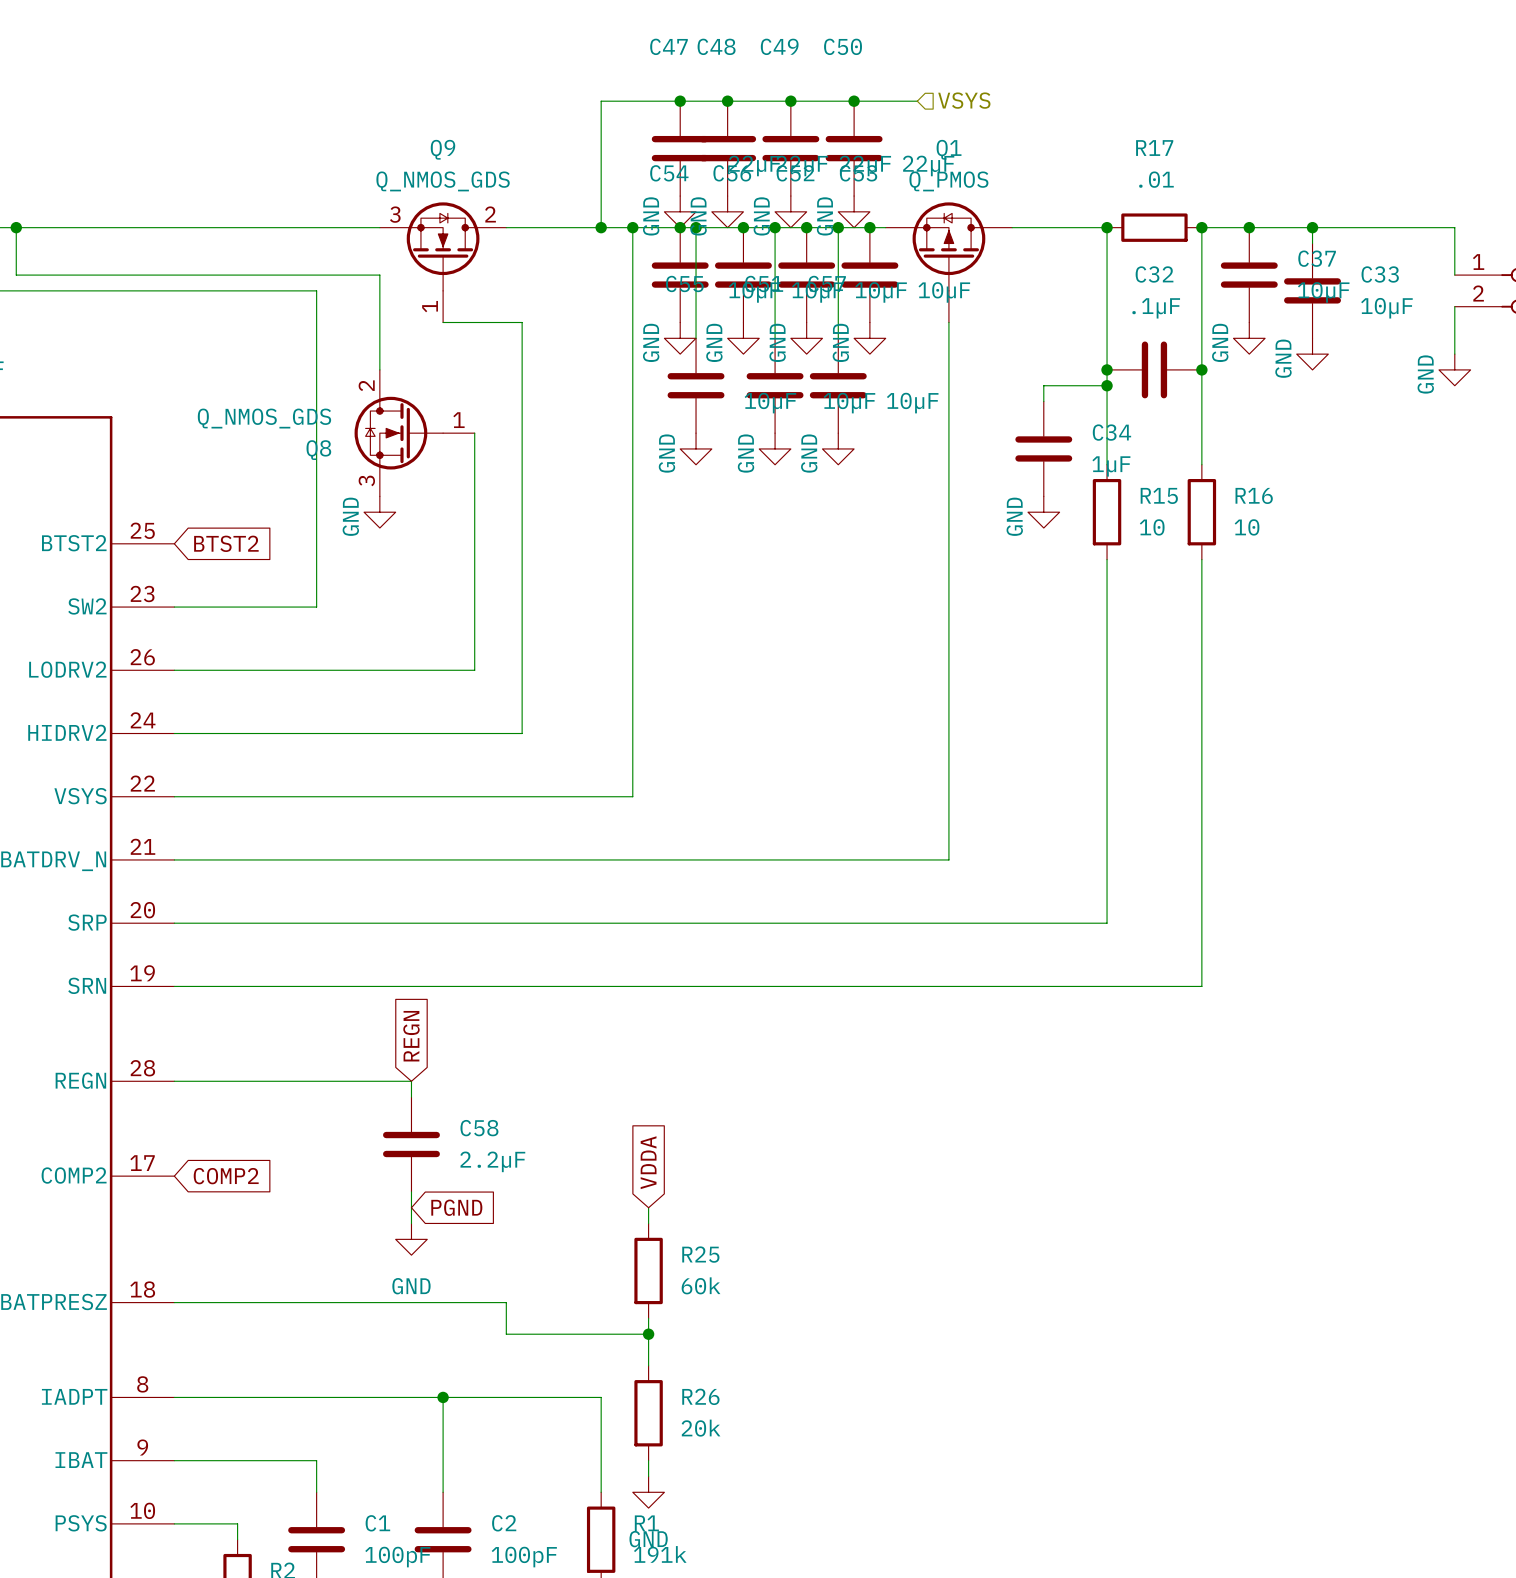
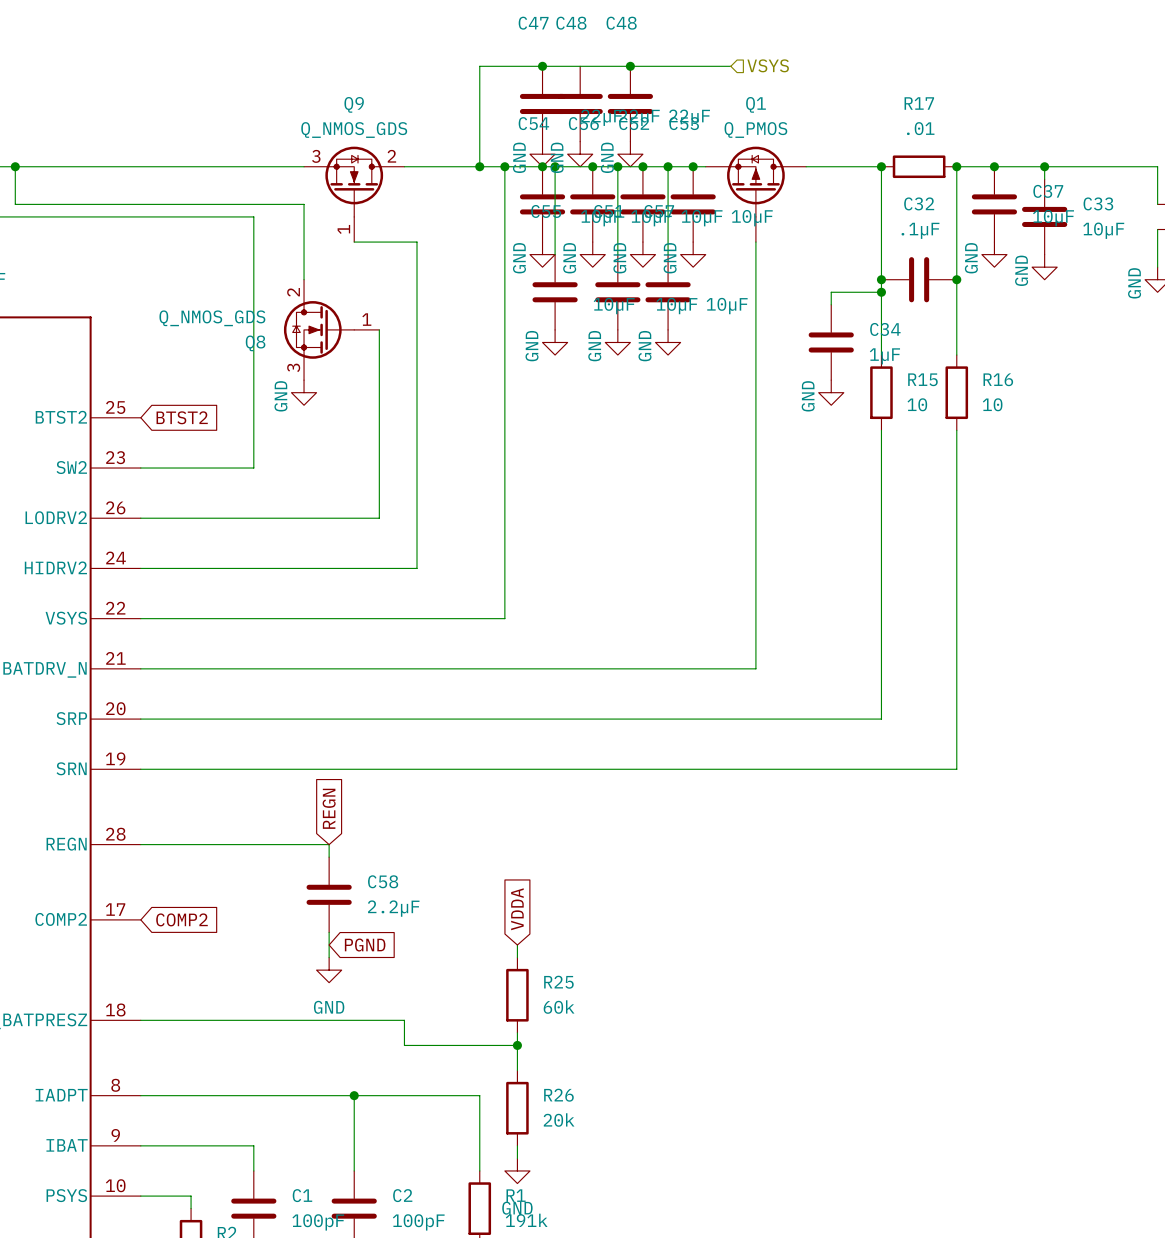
C49 name: C49 (779, 46) -> C48 (621, 23)
junction: (727, 101) -> none
junction: (854, 101) -> none
C50: 22µF (854, 148) -> none
power symbol: GND (854, 211) -> none

